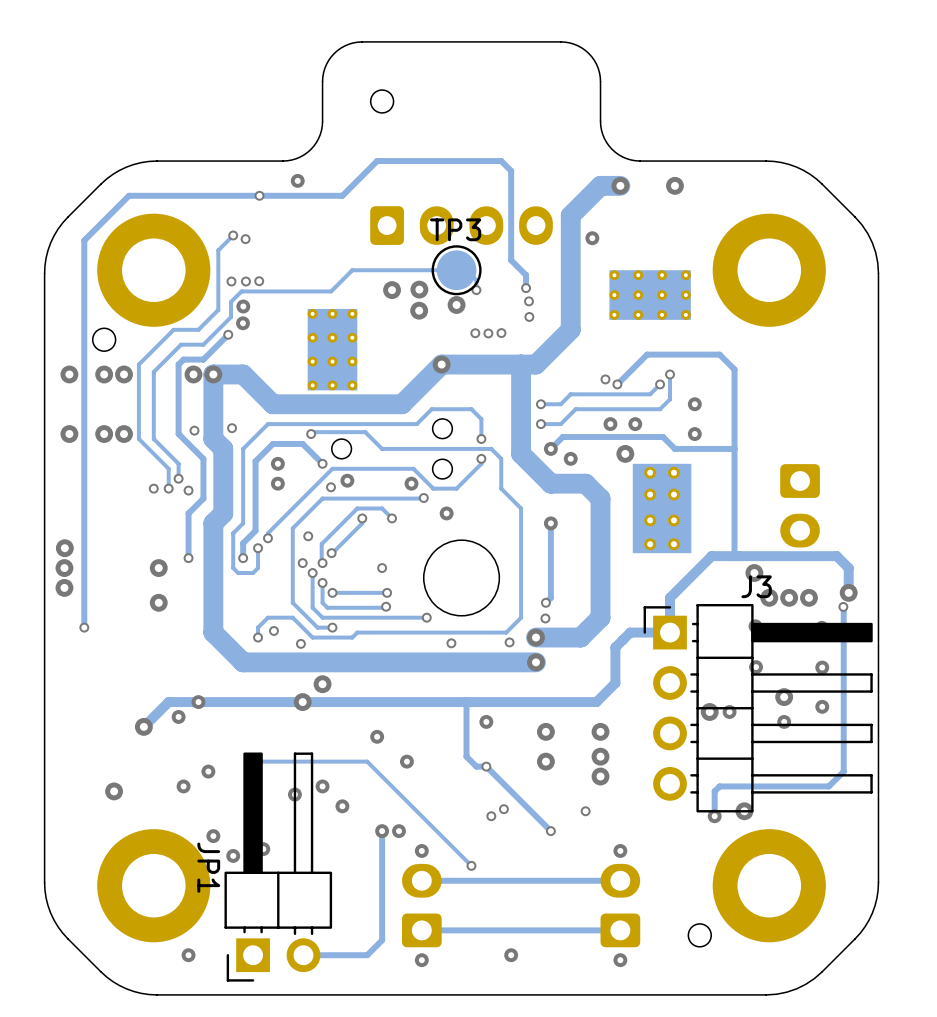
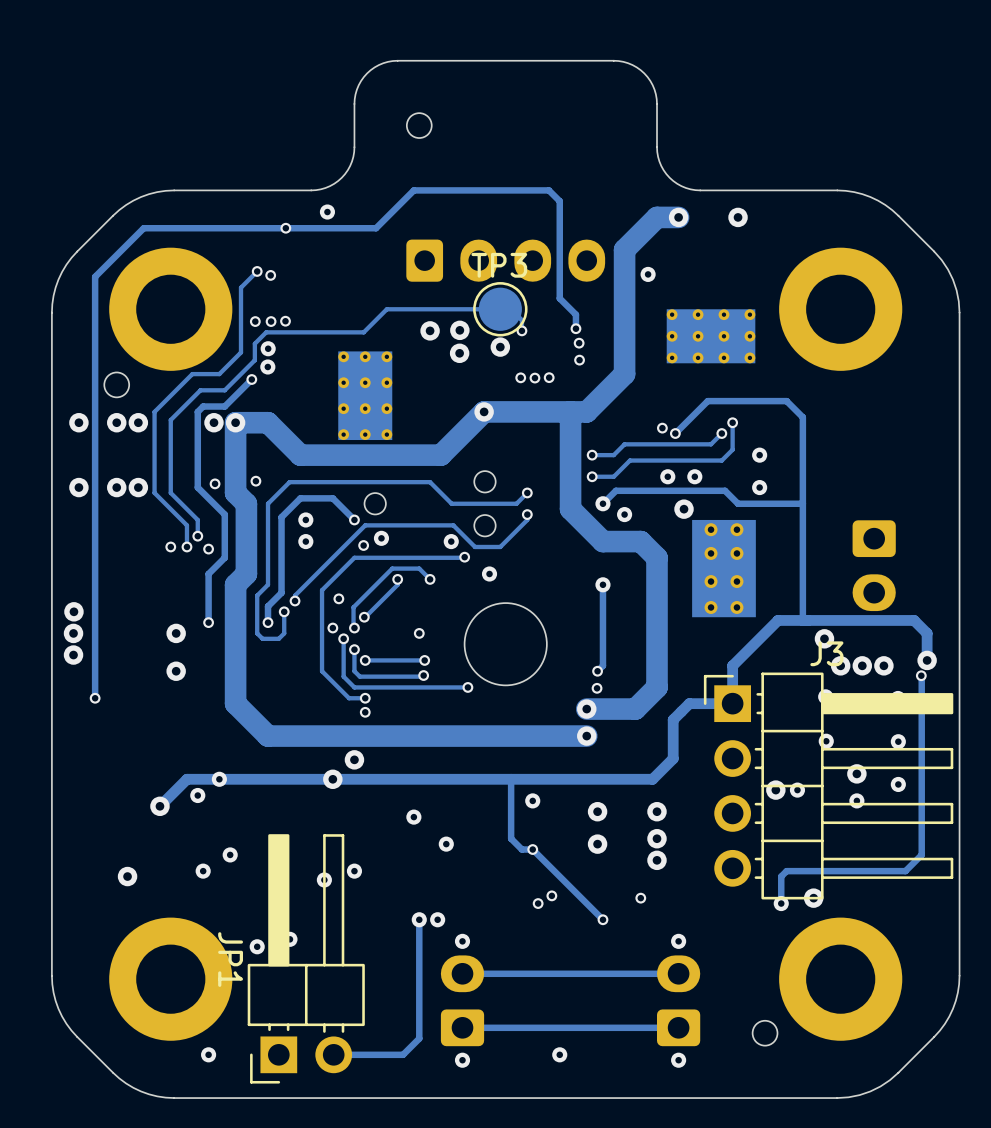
track: (263, 429) (267, 424) (416, 424) (431, 409) (471, 409) (481, 419) (481, 439) -> (516, 503) (527, 492)
track: (311, 434) (313, 432) (365, 432) (382, 448) (411, 448) -> (289, 482) (430, 482) (451, 503)
via: (311, 434) -> none
track: (471, 448) (491, 448) (501, 458) (501, 488) (521, 508) (521, 617) (506, 632) (357, 632) (352, 637) (312, 637) (292, 617) (267, 617) (258, 627) (258, 637) -> none
via: (273, 630) -> none
via: (258, 637) -> none
via: none -> (365, 712)
via: (509, 642) -> none
via: (300, 643) -> none
via: (451, 643) -> none
track: (258, 761) (367, 761) (471, 865) -> none
via: (342, 806) -> none
via: (213, 836) -> none
via: (471, 865) -> none

